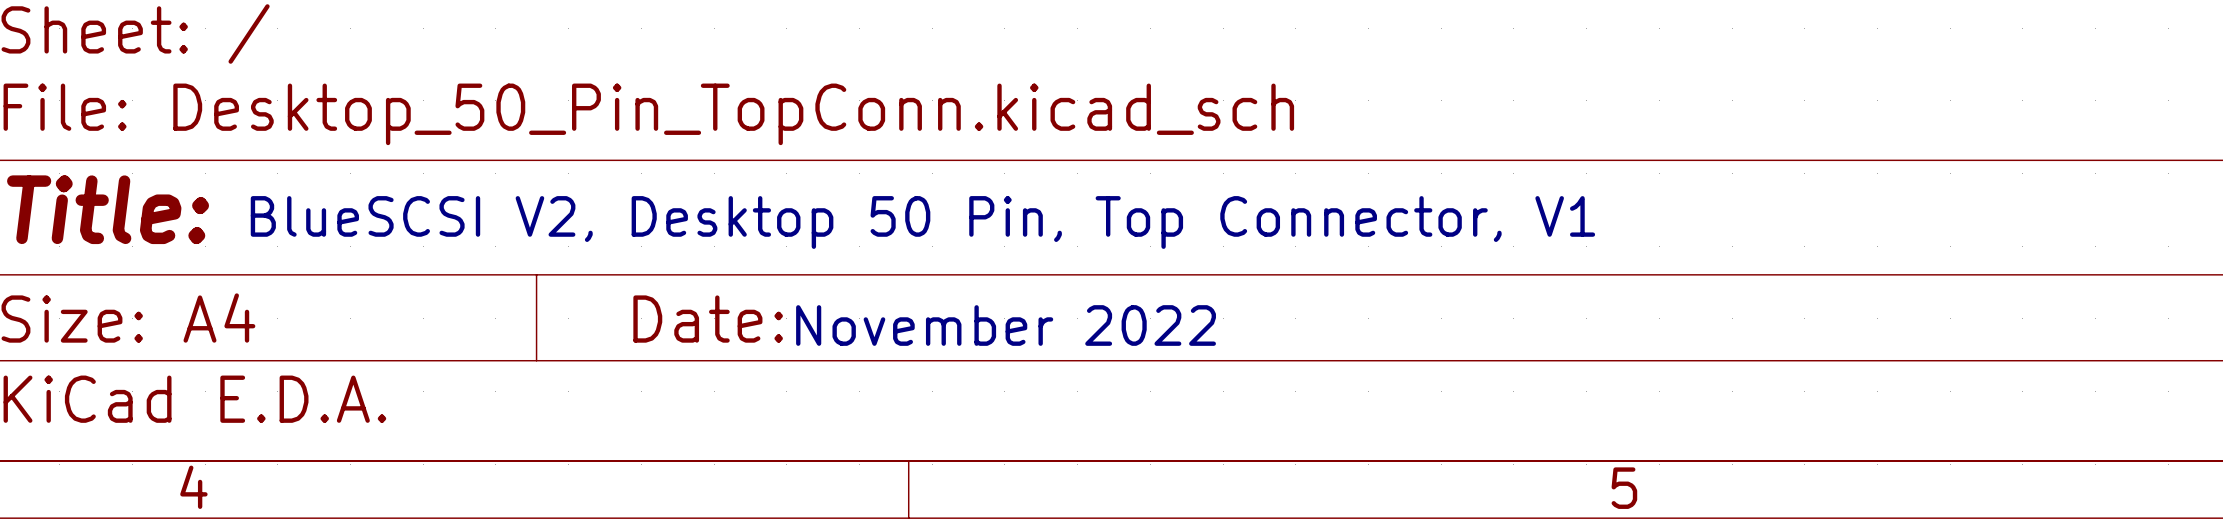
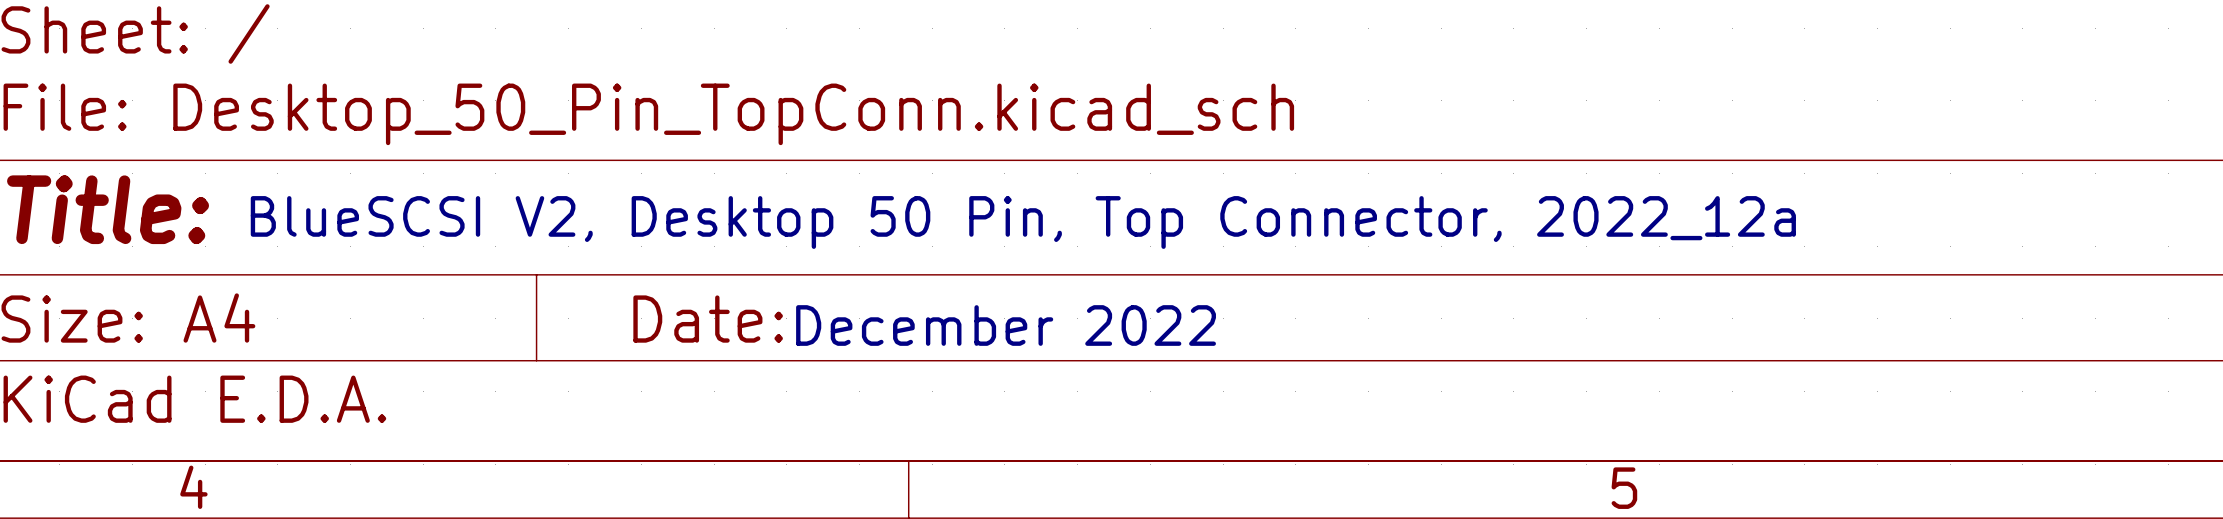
text: BlueSCSI V2, Desktop 50 Pin, Top Connector, V1 (922, 222) -> BlueSCSI V2, Desktop 50 Pin, Top Connector, 2022_12a (1023, 222)
text: November 2022 (1006, 325) -> December 2022 (1006, 325)

